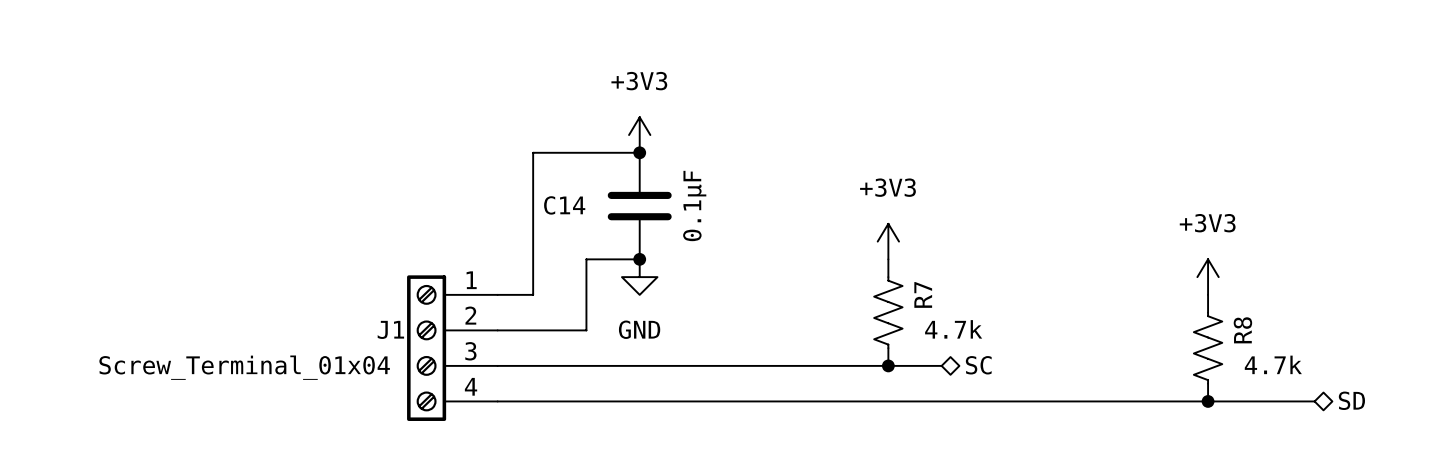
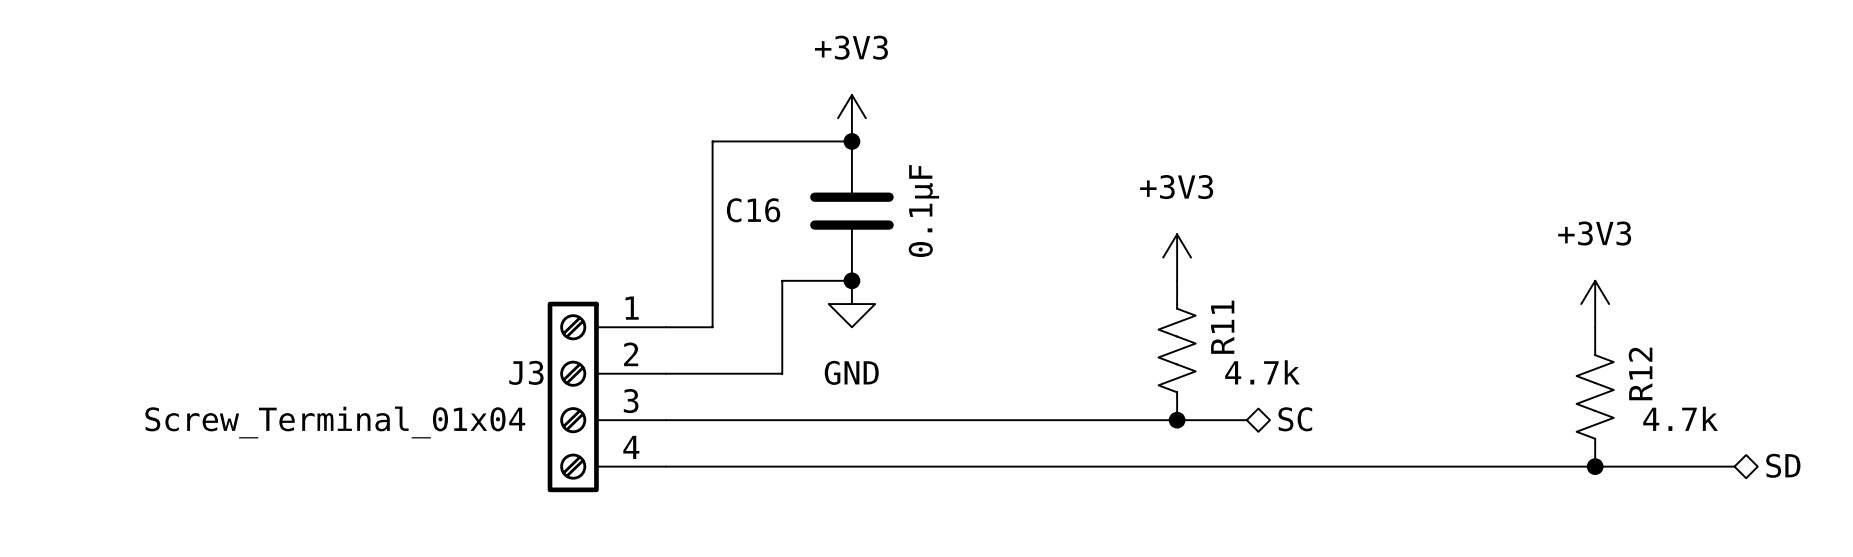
C14 name: C14 (564, 205) -> C16 (753, 210)
R7 name: R7 (923, 294) -> R11 (1222, 327)
J1 name: J1 (390, 329) -> J3 (526, 372)
R8 name: R8 (1242, 330) -> R12 (1640, 373)

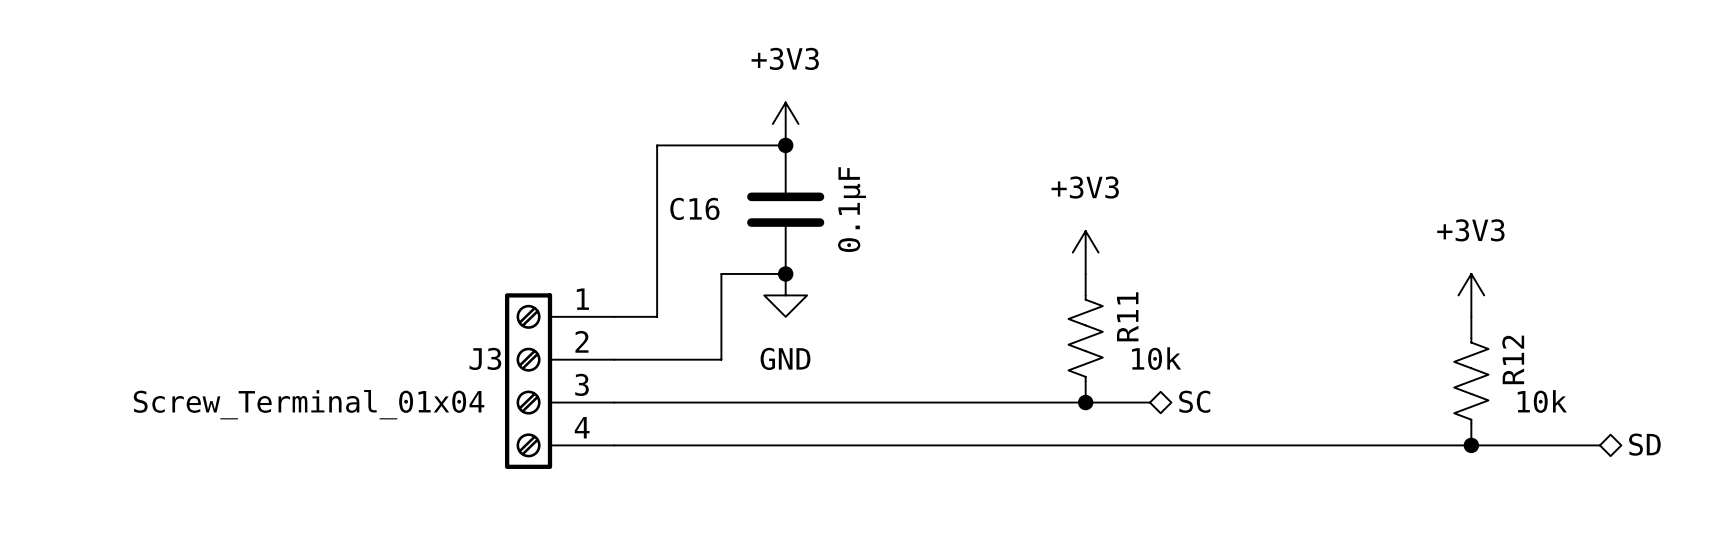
R11 value: 4.7k (1262, 372) -> 10k (1156, 358)
R12 value: 4.7k (1680, 418) -> 10k (1542, 401)

